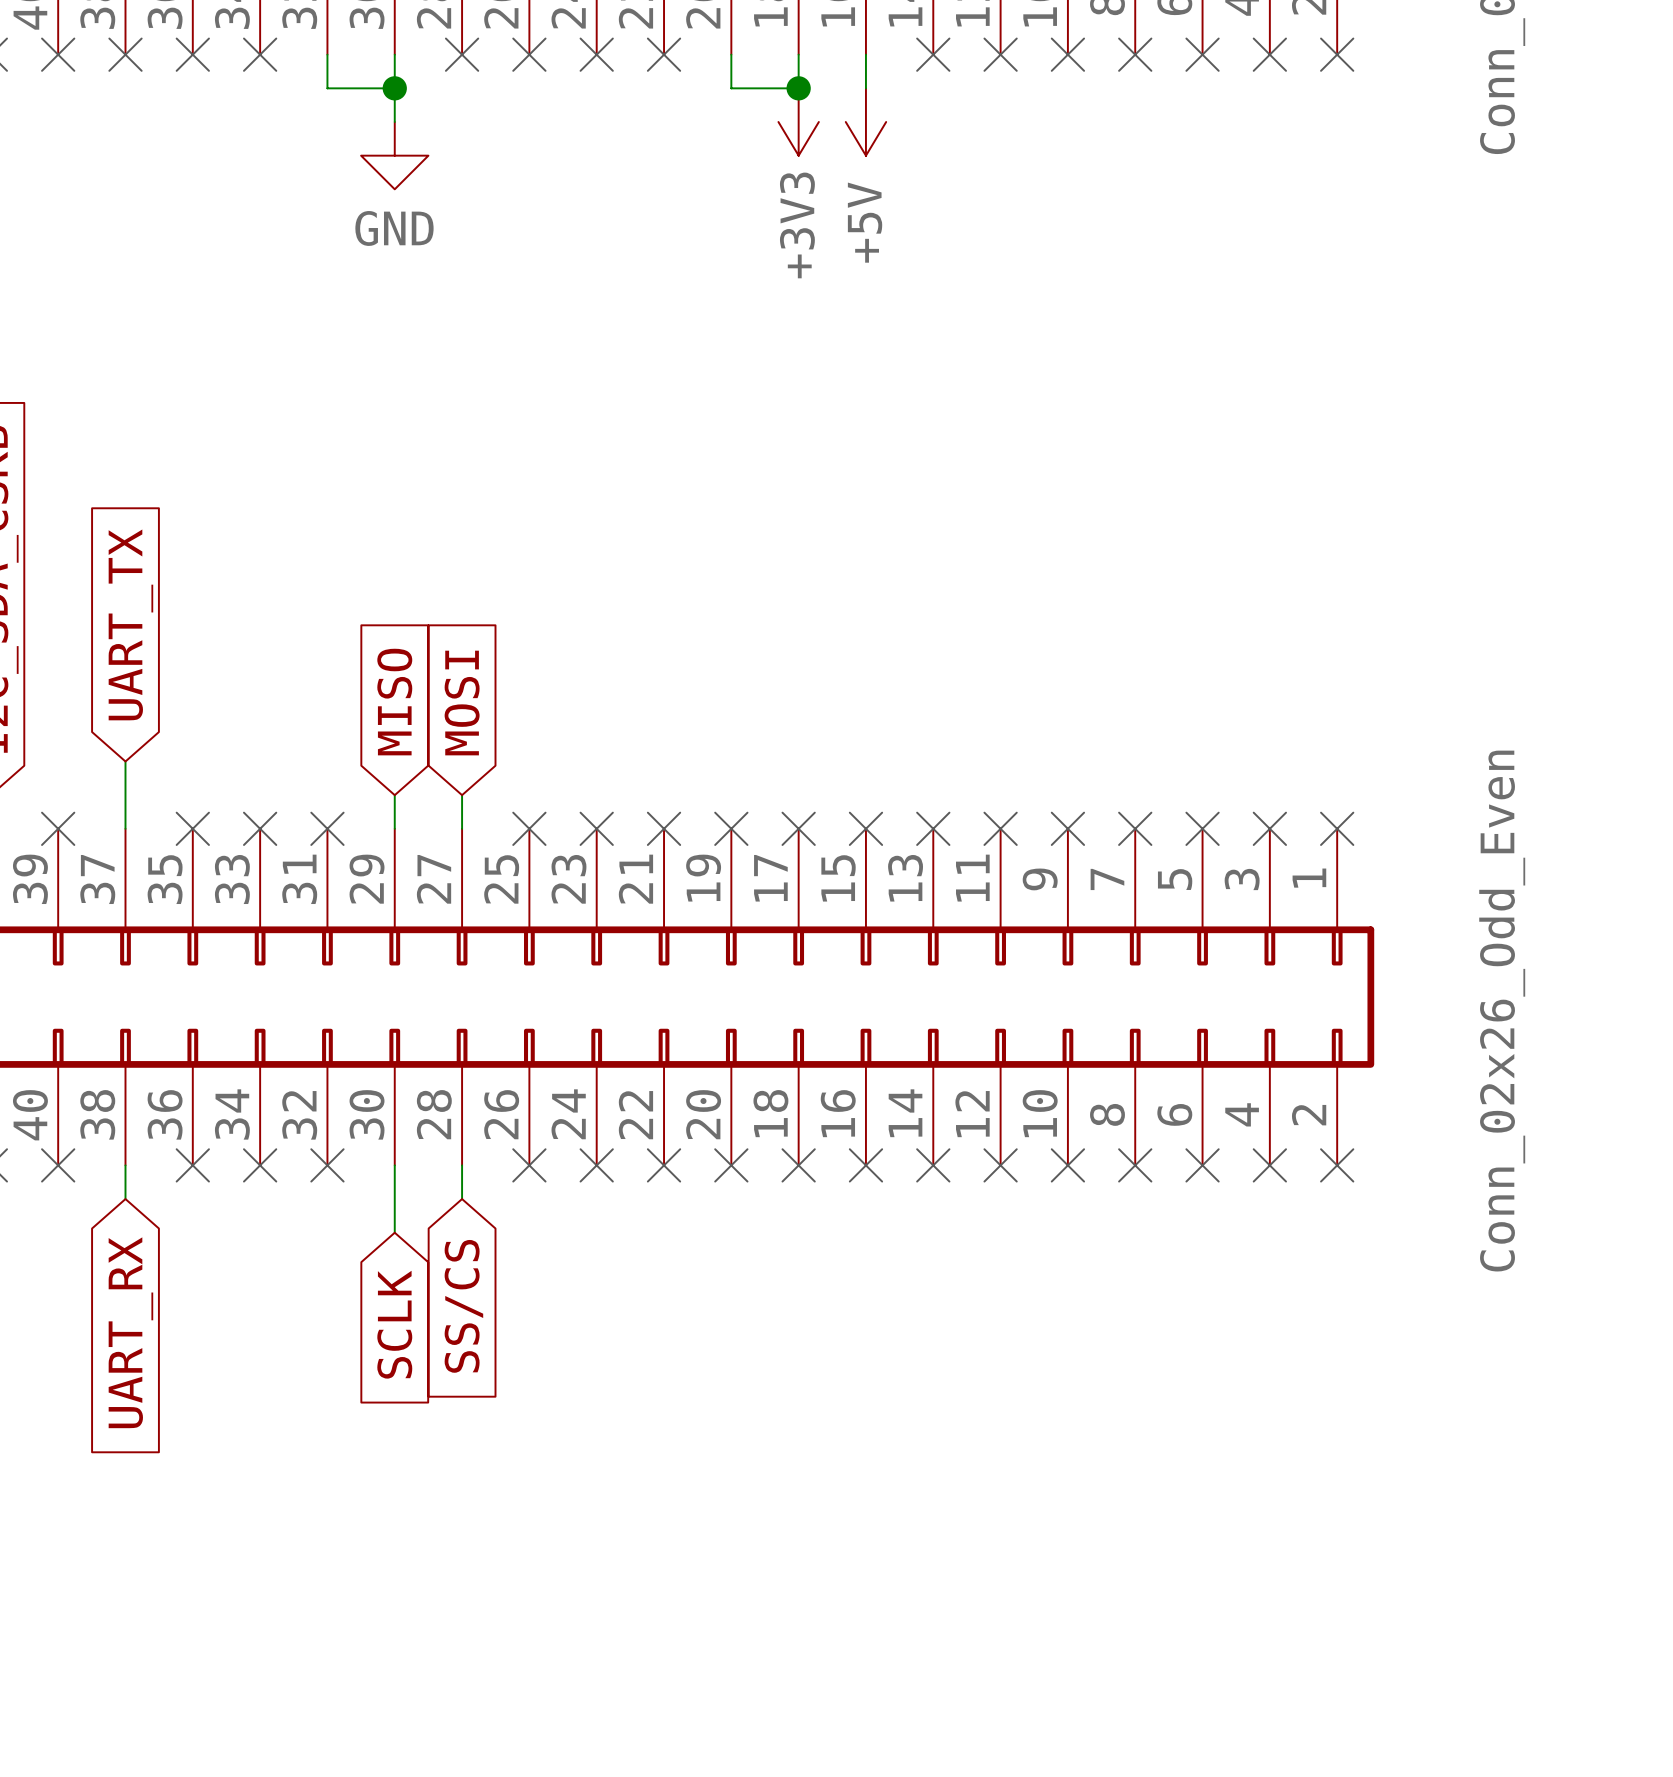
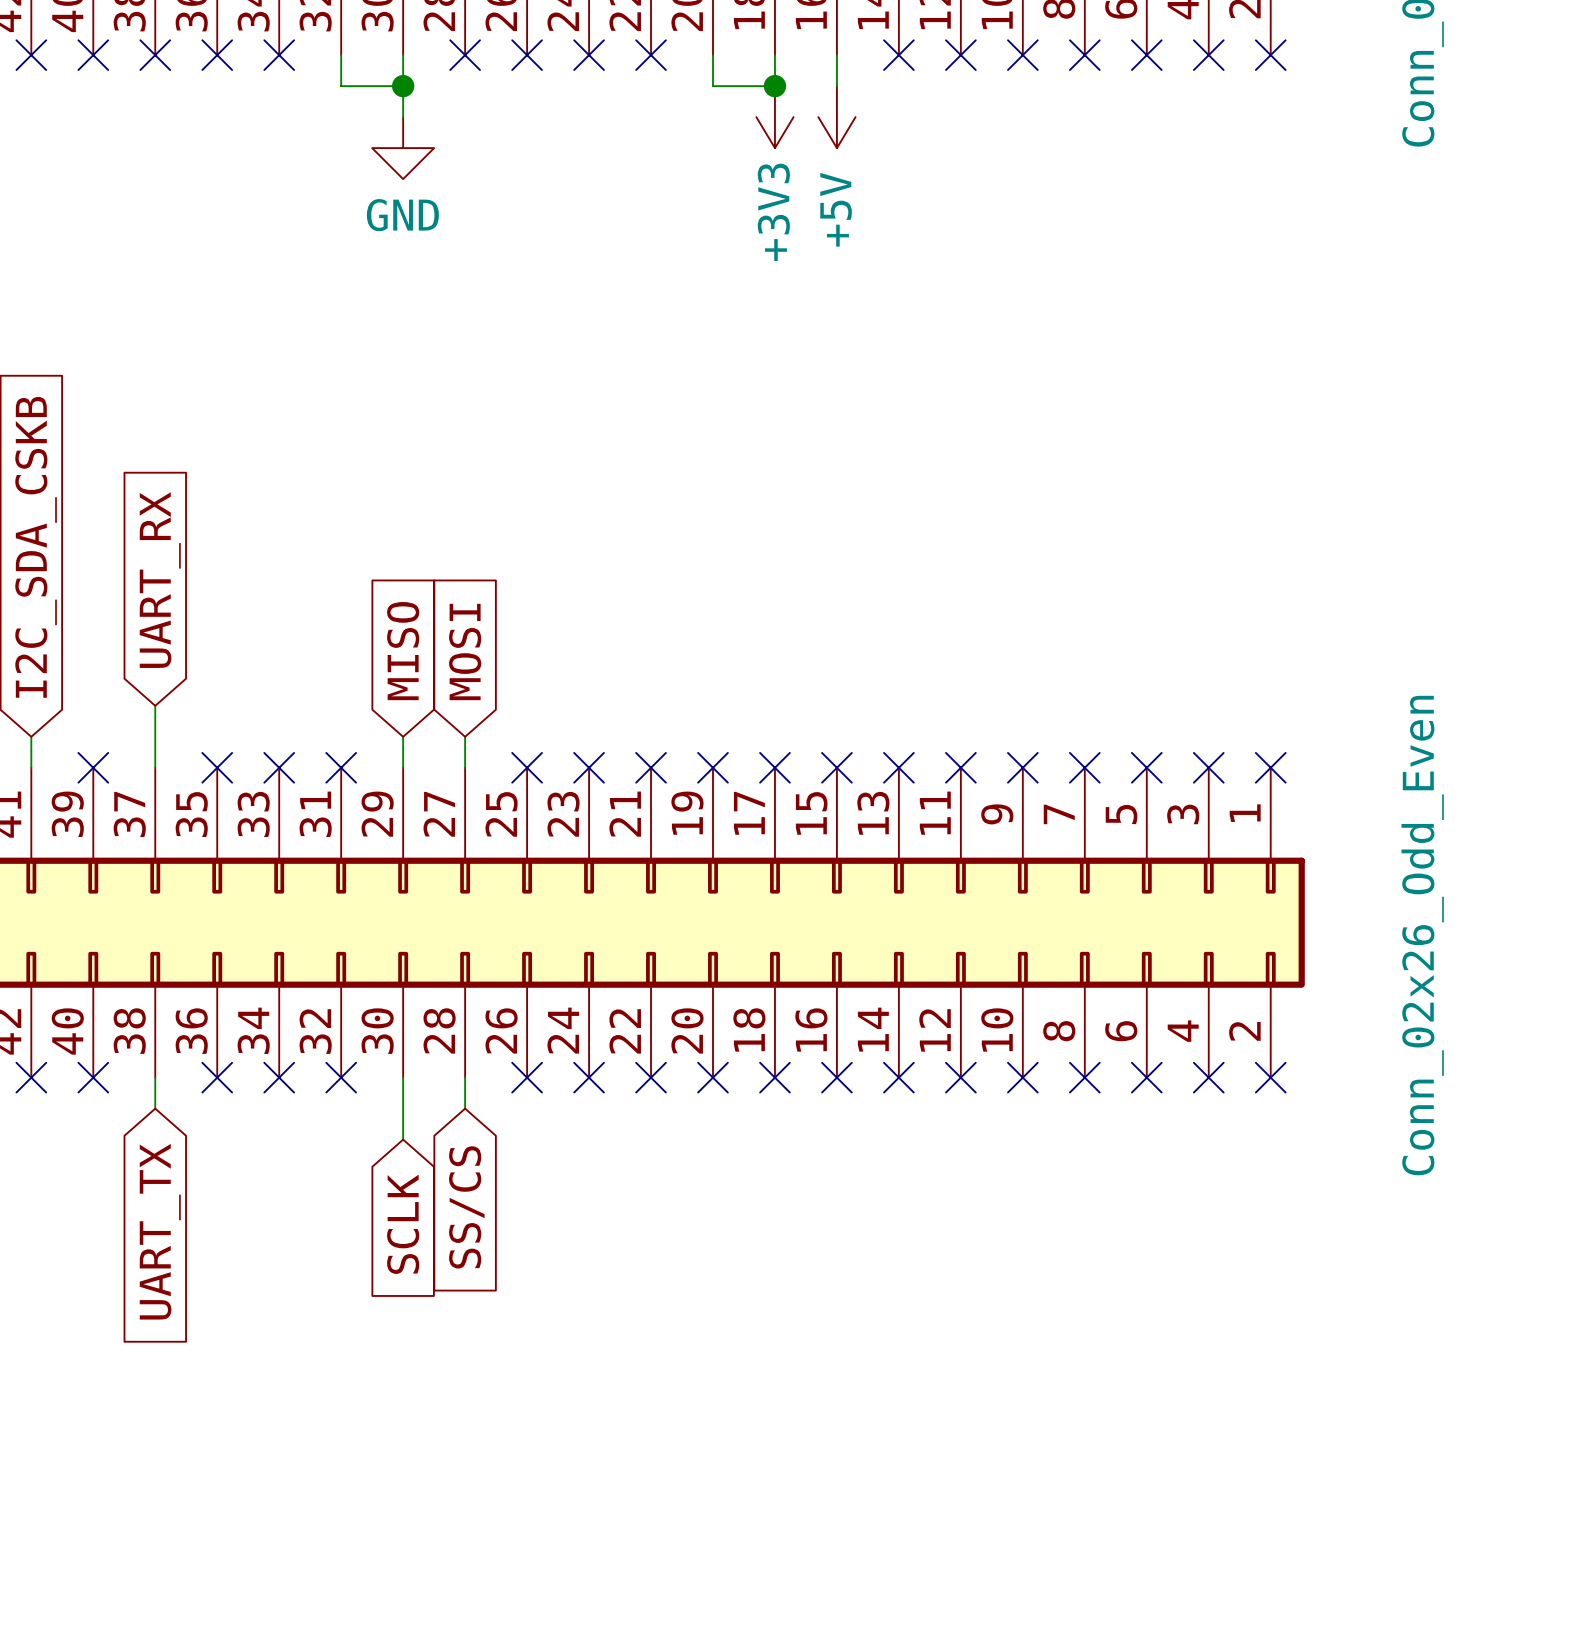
global label: UART_TX (130, 624) -> UART_RX (160, 580)
global label: UART_RX (130, 1332) -> UART_TX (160, 1231)

